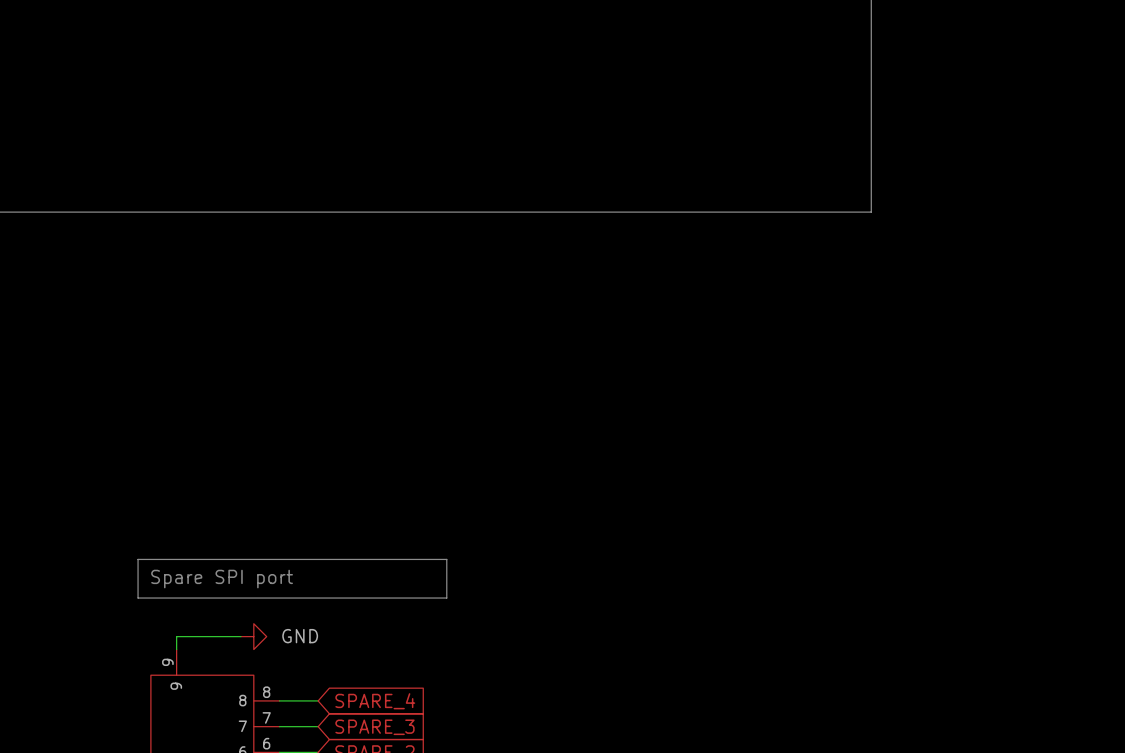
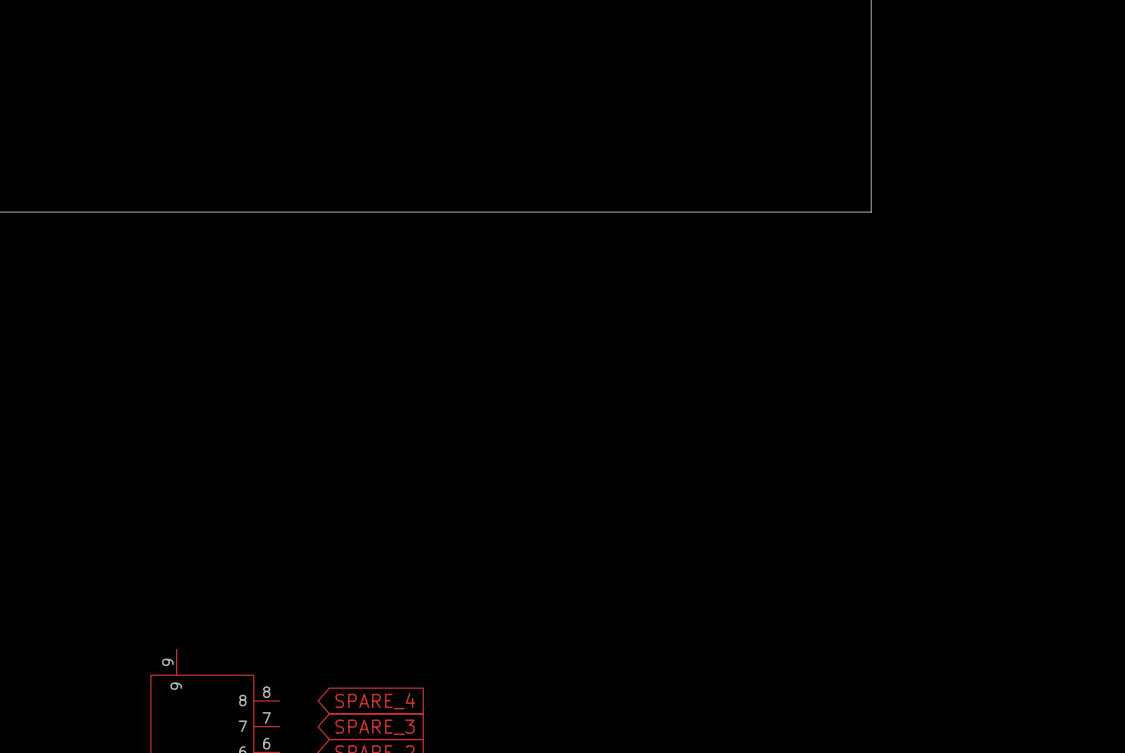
line: (138, 559) (446, 559) (446, 598) (138, 598) (138, 559) -> none
text: Spare SPI port (222, 579) -> none
wire: (240, 636) (176, 636) (176, 649) -> none
power symbol: GND (253, 636) -> none
wire: (279, 700) (318, 700) -> none
wire: (279, 726) (318, 726) -> none
wire: (279, 752) (318, 752) -> none

